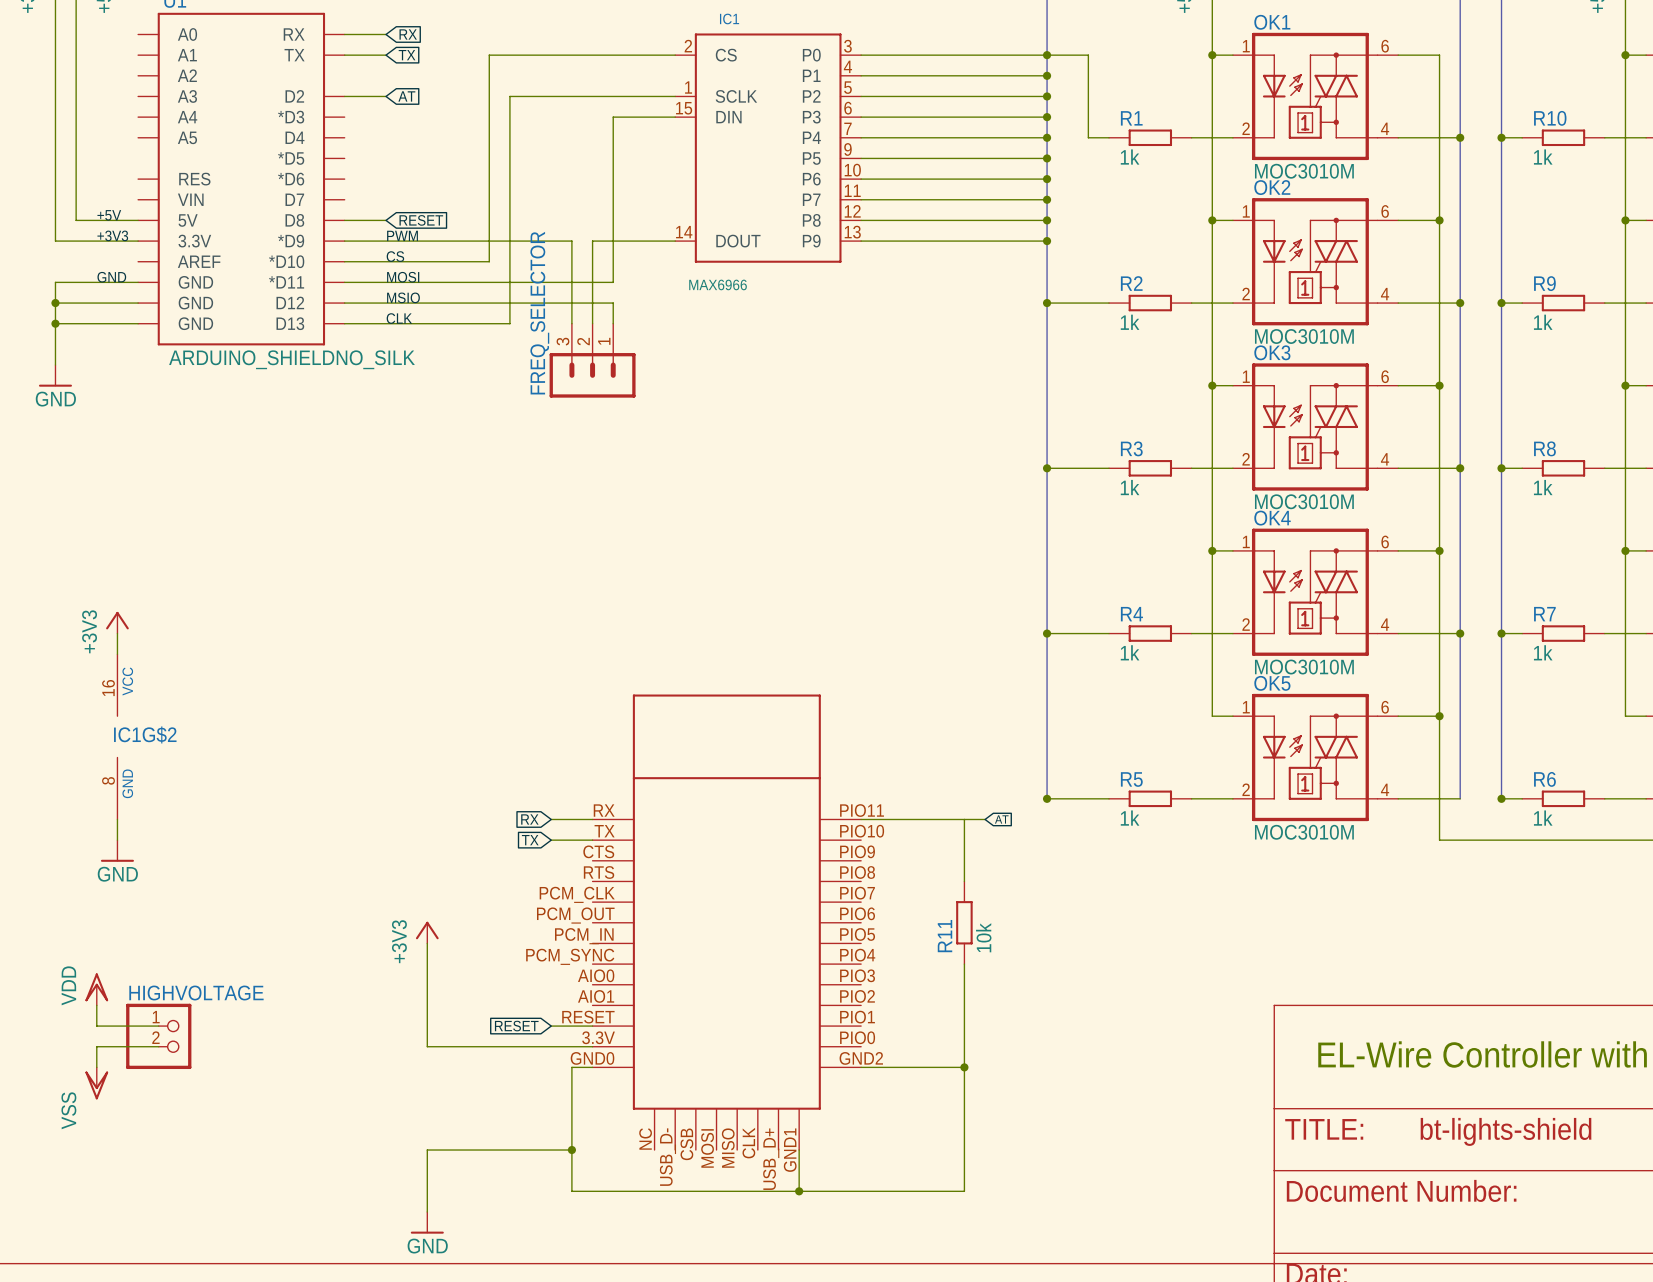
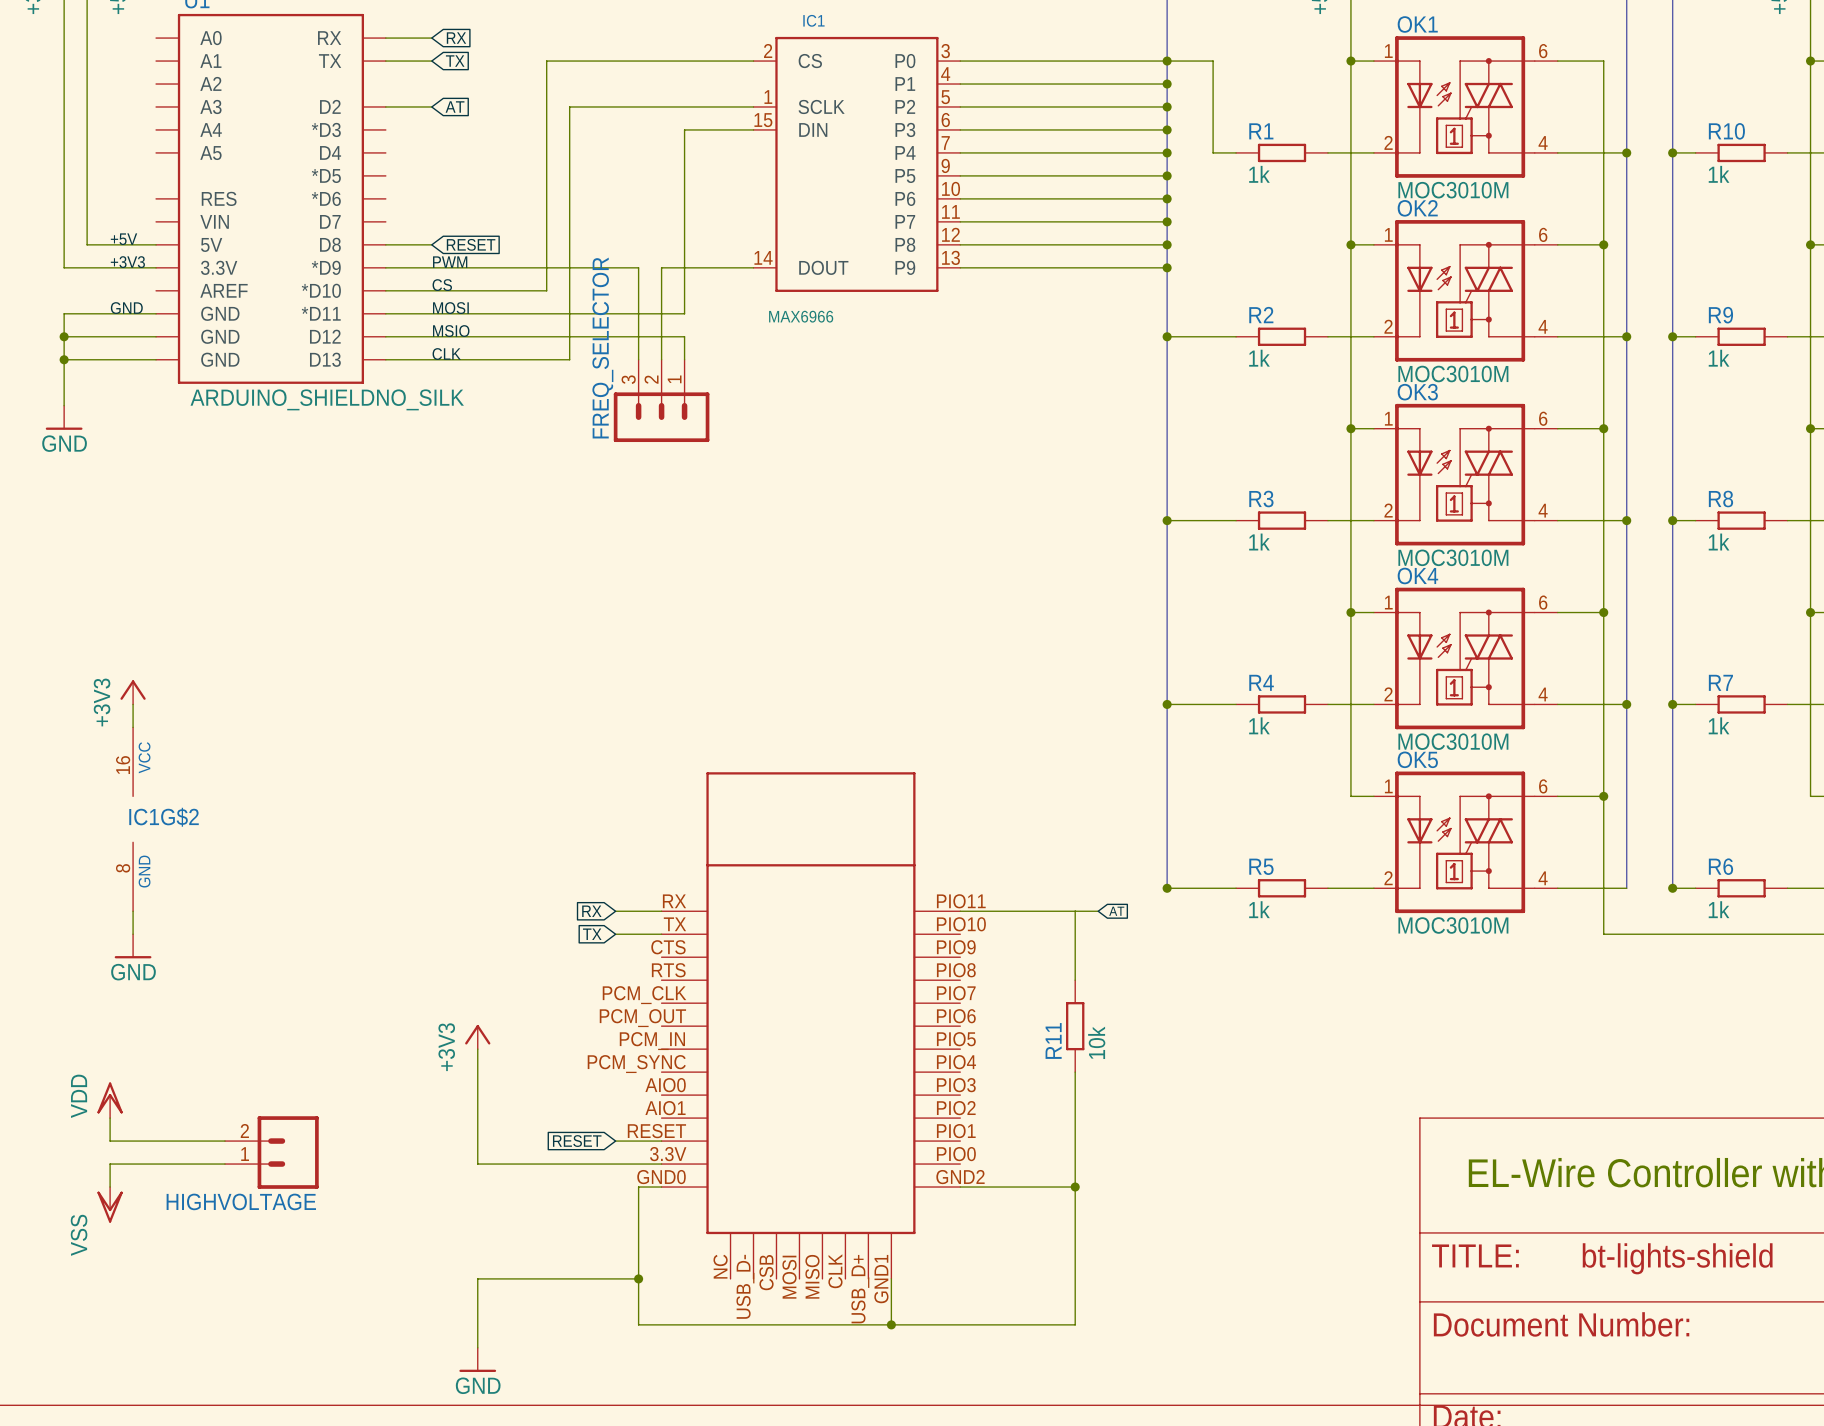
wire: none -> (179, 1141) (224, 1141)
HIGHVOLTAGE: (158, 1036) -> none
HIGHVOLTAGE: none -> (271, 1152)
wire: none -> (179, 1164) (224, 1164)

